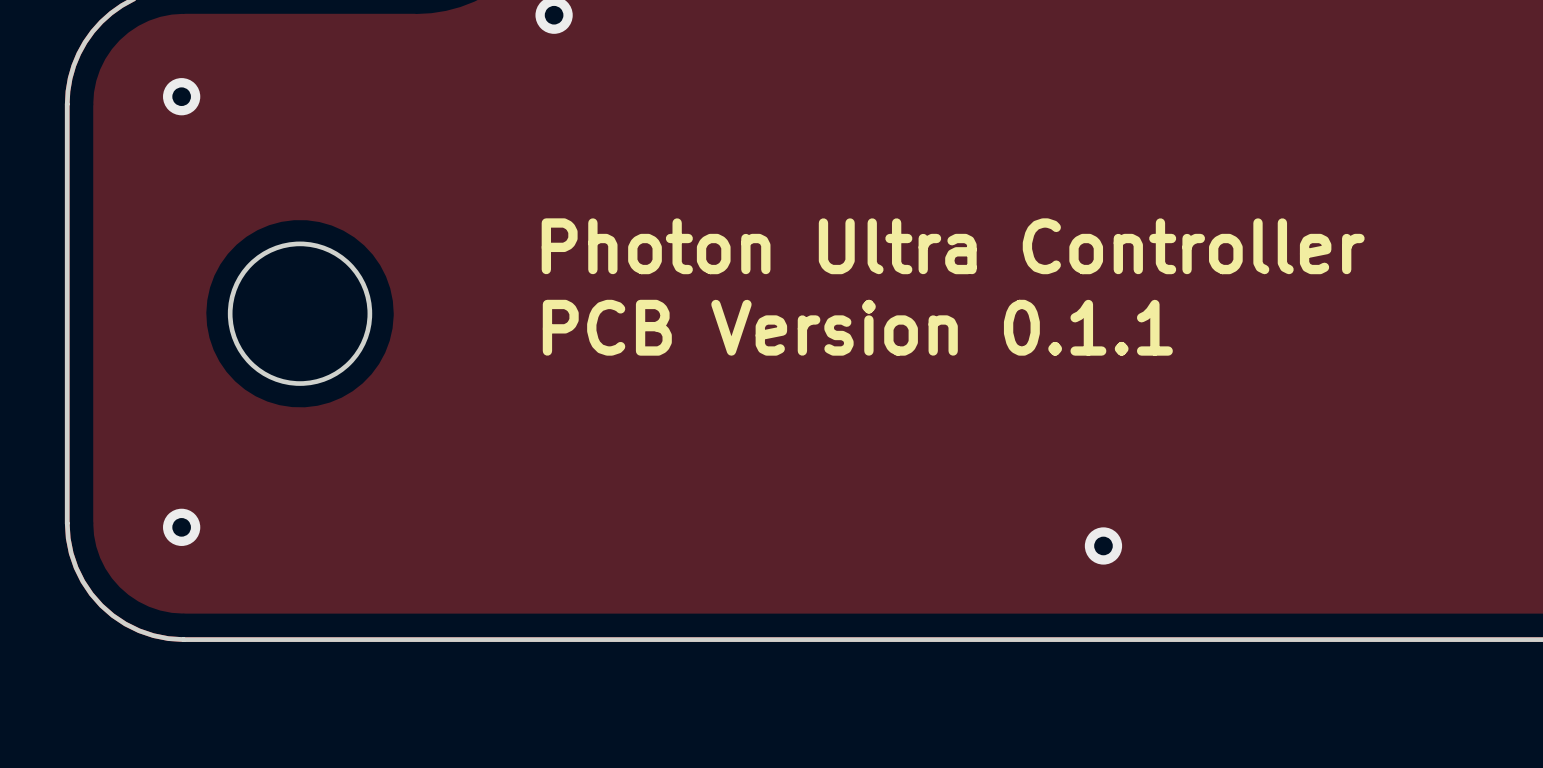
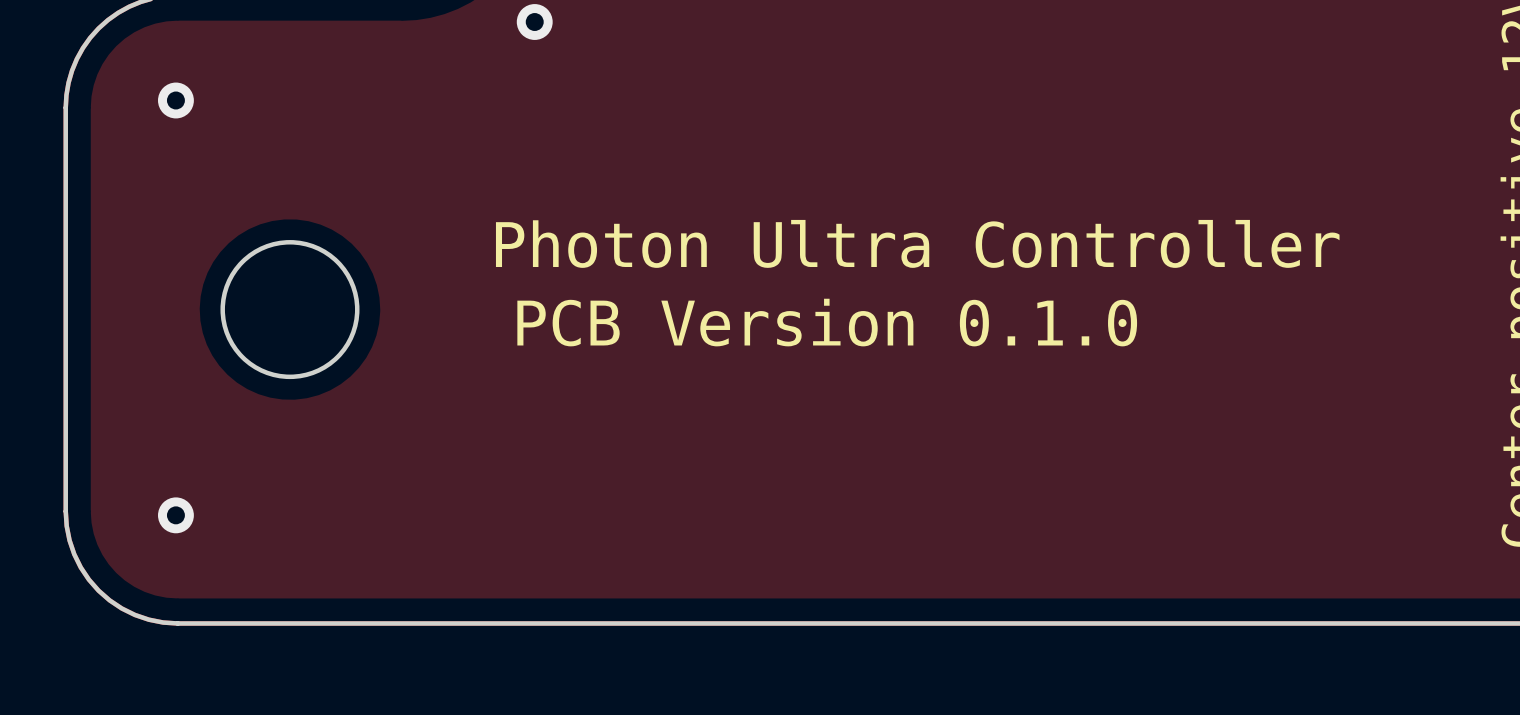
text: PCB Version 0.1.1 (857, 327) -> PCB Version 0.1.0 (827, 322)
via: (1103, 545) -> none

